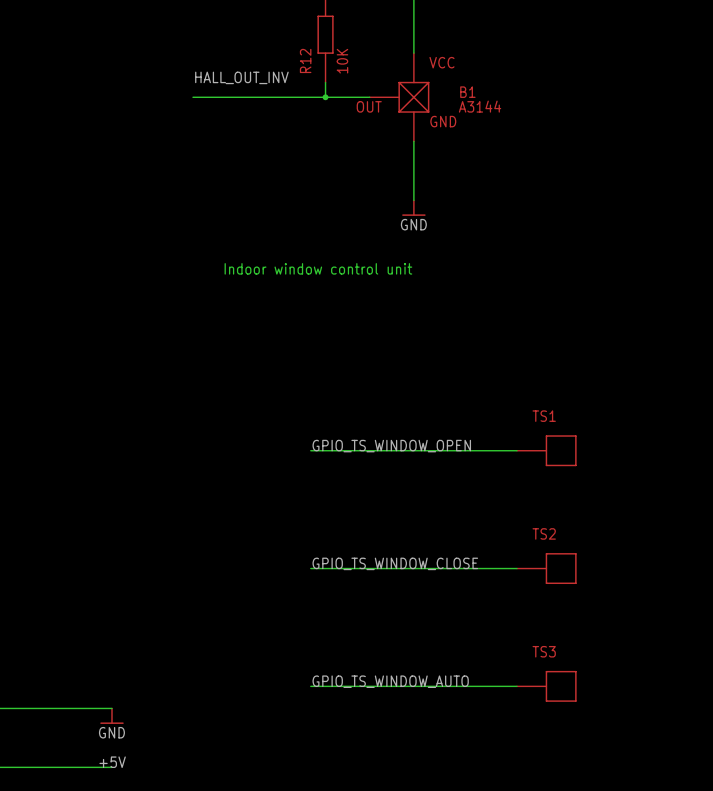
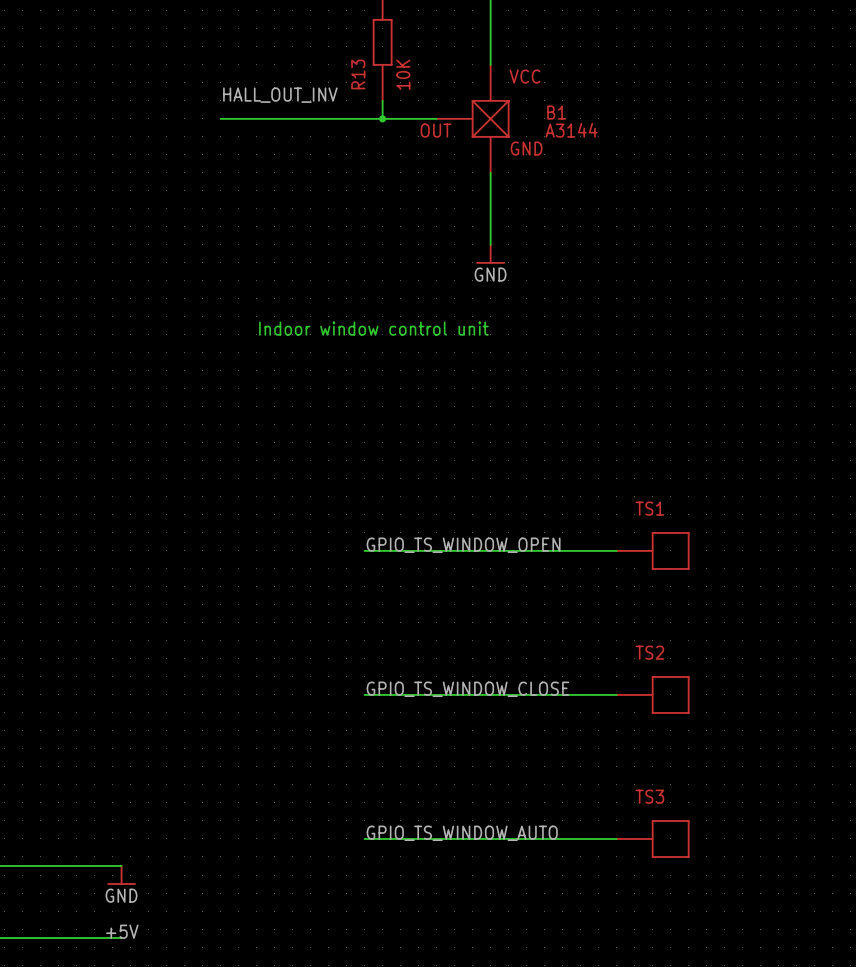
R12 name: R12 (305, 60) -> R13 (358, 74)

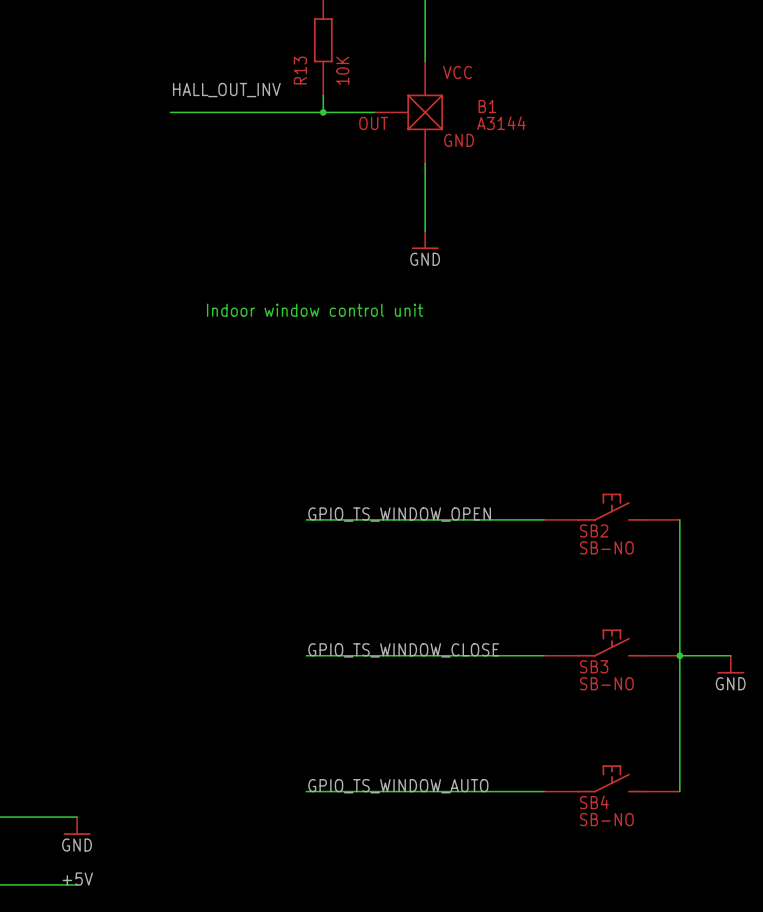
SB2: none -> SB-NO (611, 507)
TS1: (653, 550) -> none
wire: none -> (679, 519) (679, 791)
SB3: none -> SB-NO (611, 643)
TS2: (653, 694) -> none
wire: none -> (679, 655) (730, 655)
junction: none -> (679, 655)
power symbol: none -> GND (730, 664)
SB4: none -> SB-NO (611, 778)
TS3: (653, 838) -> none

